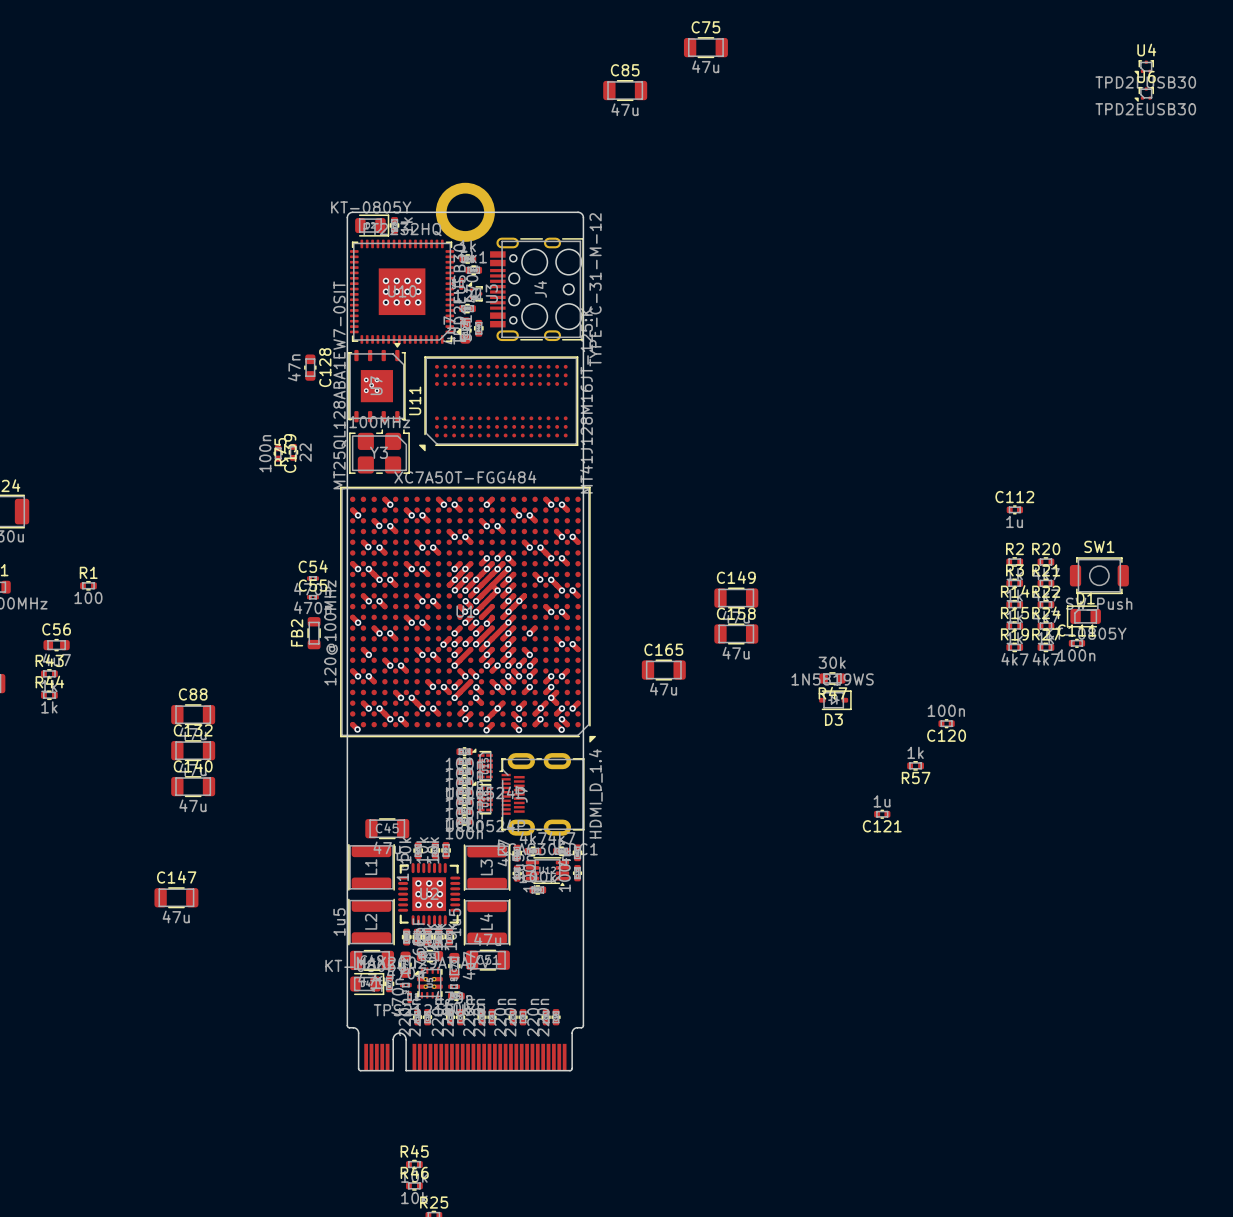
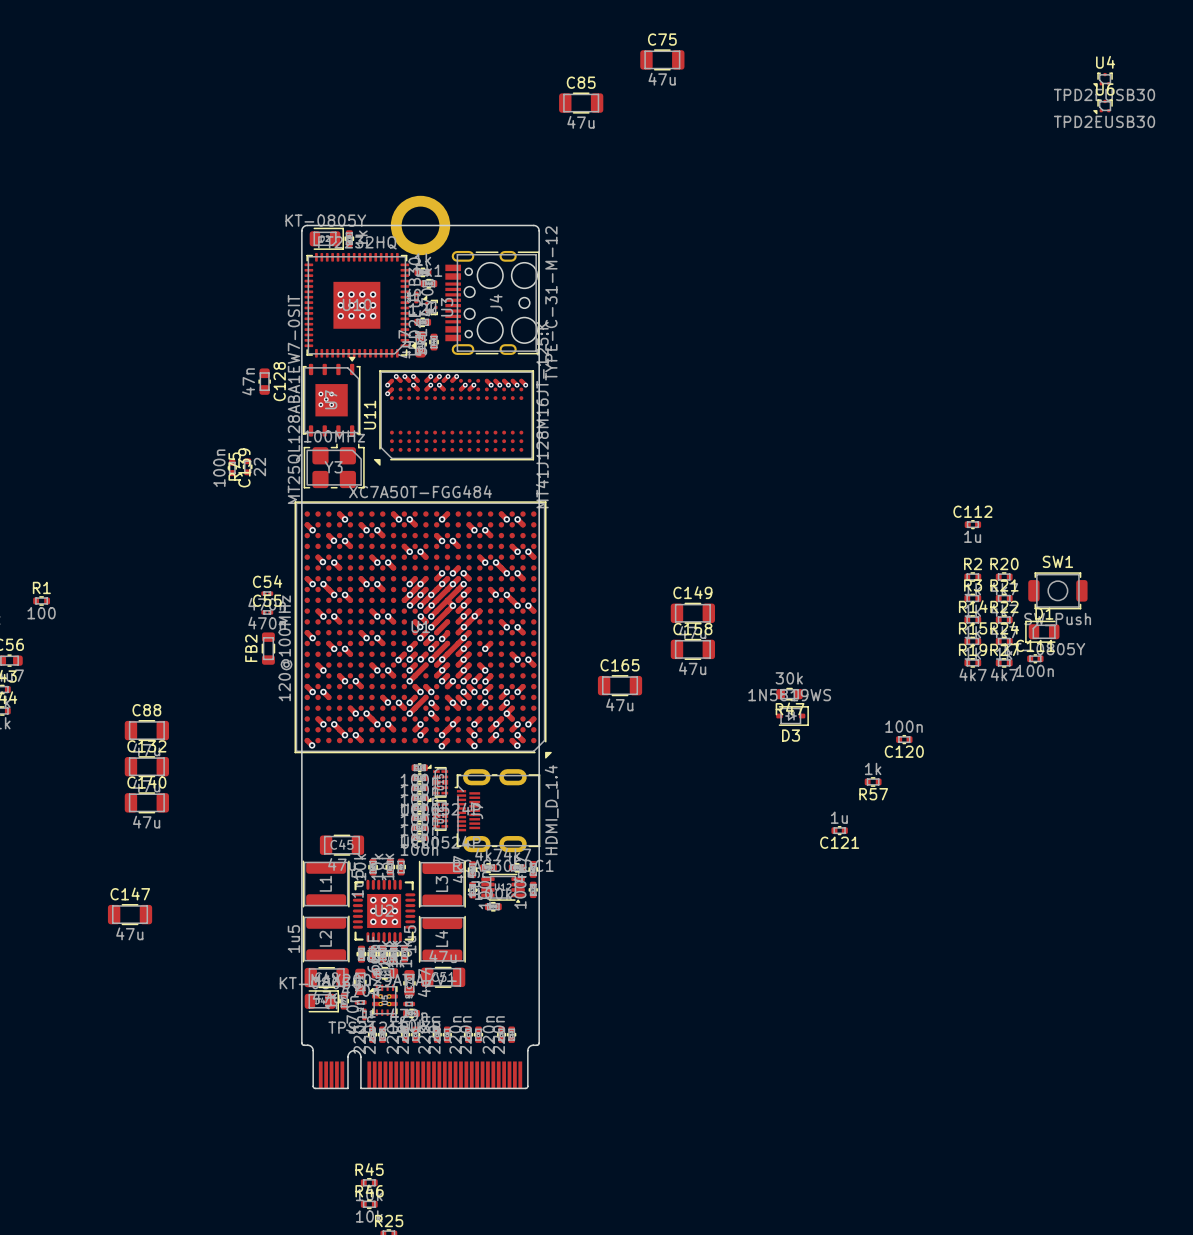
track: none -> (396, 376) (400, 380)
via: none -> (396, 376)
track: none -> (404, 376) (409, 380)
via: none -> (404, 376)
track: none -> (413, 376) (417, 380)
via: none -> (413, 376)
track: none -> (430, 376) (426, 380)
via: none -> (430, 376)
track: none -> (439, 376) (435, 380)
via: none -> (439, 376)
track: none -> (448, 376) (443, 380)
via: none -> (448, 376)
track: none -> (456, 376) (452, 380)
via: none -> (456, 376)
track: none -> (391, 380) (387, 385)
track: none -> (486, 380) (491, 385)
track: none -> (495, 380) (499, 385)
track: none -> (504, 380) (508, 385)
track: none -> (512, 380) (517, 385)
track: none -> (521, 380) (525, 385)
via: none -> (387, 385)
track: none -> (413, 385) (417, 389)
via: none -> (413, 385)
track: none -> (430, 385) (426, 389)
via: none -> (430, 385)
track: none -> (439, 385) (443, 389)
via: none -> (439, 385)
track: none -> (465, 385) (460, 389)
via: none -> (465, 385)
track: none -> (473, 385) (469, 389)
via: none -> (473, 385)
via: none -> (491, 385)
via: none -> (499, 385)
via: none -> (508, 385)
via: none -> (517, 385)
via: none -> (525, 385)
track: none -> (391, 389) (387, 393)
via: none -> (387, 393)

